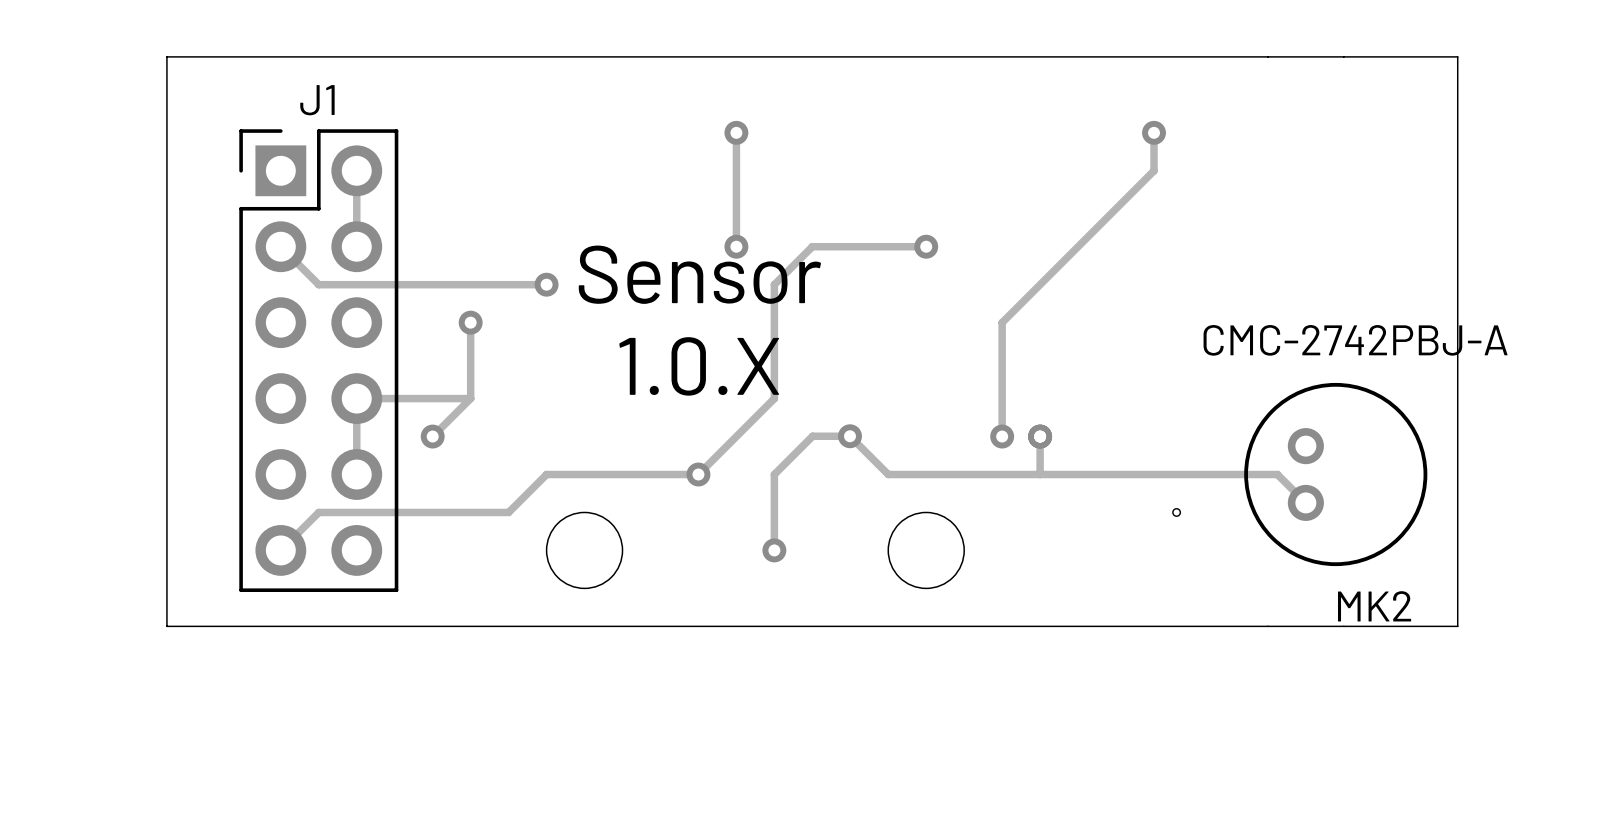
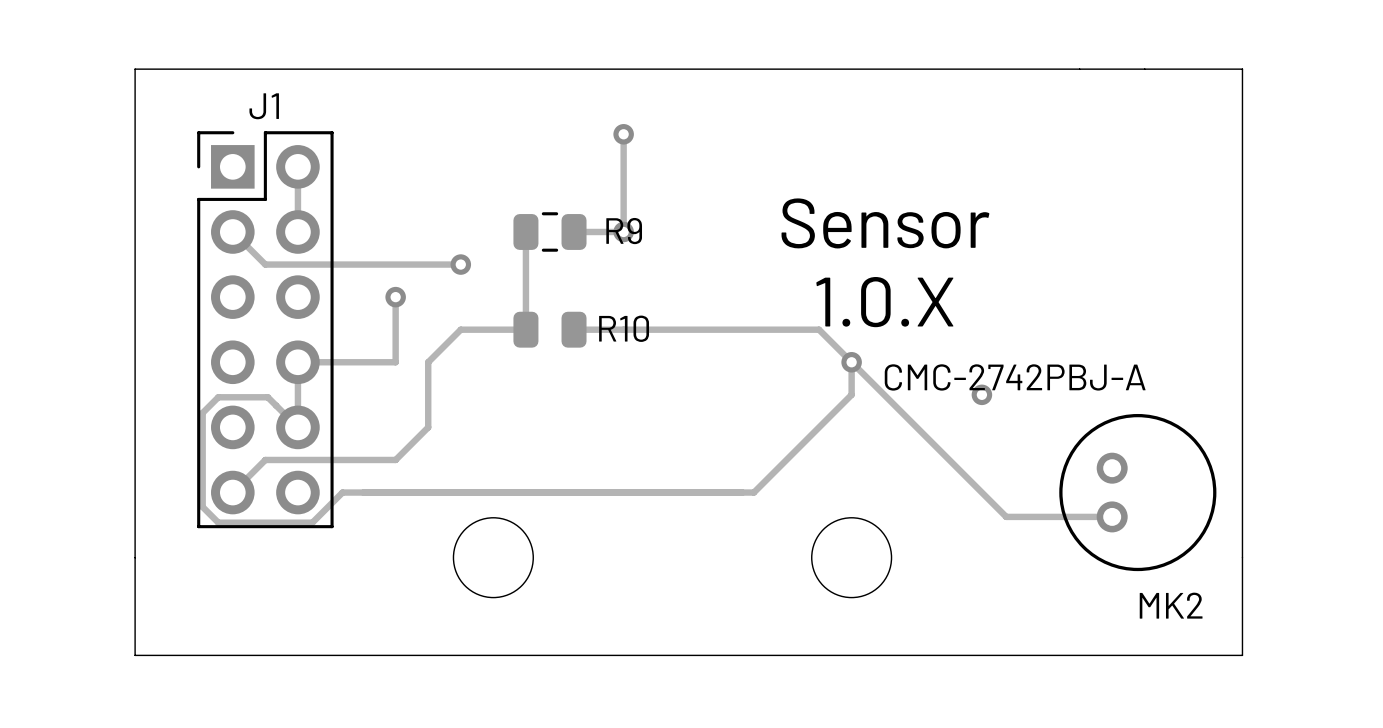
track: (1154, 132) (1154, 170) (1002, 322) (1002, 398) -> none
via: (1154, 132) -> none
R9: none -> (549, 231)
track: none -> (623, 231) (574, 231)
track: (926, 246) (812, 246) (774, 284) (774, 398) (698, 474) (546, 474) (508, 512) (470, 512) -> (525, 231) (525, 329) (460, 329) (428, 362) (428, 427) (395, 459)
via: (926, 246) -> none
text position: Sensor (699, 274) -> Sensor (885, 223)
MK2 value position: CMC-2742PBJ-A (1355, 340) -> CMC-2742PBJ-A (1015, 377)
R10: none -> (549, 329)
track: none -> (582, 329) (819, 329) (1006, 516) (1112, 516)
text position: 1.0.X (699, 366) -> 1.0.X (884, 302)
track: (470, 398) (432, 436) -> none
via: none -> (851, 362)
via: (432, 436) -> none
via: (850, 436) -> none
track: none -> (851, 394) (753, 492) (342, 492) (312, 522) (218, 522) (202, 507) (202, 412) (218, 397) (267, 397) (297, 427)
via: (1002, 436) -> none
track: (1040, 436) (1040, 474) -> none
via: (1040, 436) -> none
via: none -> (981, 394)
via: (698, 474) -> none
MK2 position: (1335, 474) -> (1137, 492)
track: (1305, 502) (1277, 474) (888, 474) (850, 436) (812, 436) (774, 474) (774, 550) -> none
round board edge: [545, 511, 624, 590] -> none
round board edge: [887, 511, 965, 590] -> none
part: (1176, 512) -> none
via: (774, 550) -> none
round board edge: none -> [452, 517, 534, 599]
round board edge: none -> [811, 517, 893, 599]
board edge: (1457, 626) (166, 626) -> (1242, 557) (1242, 655) (135, 655) (135, 557)

